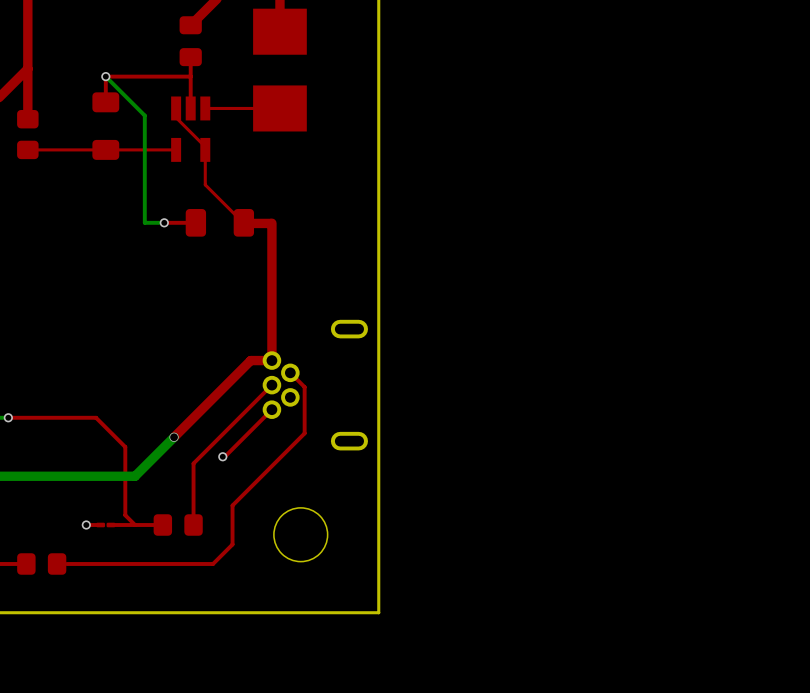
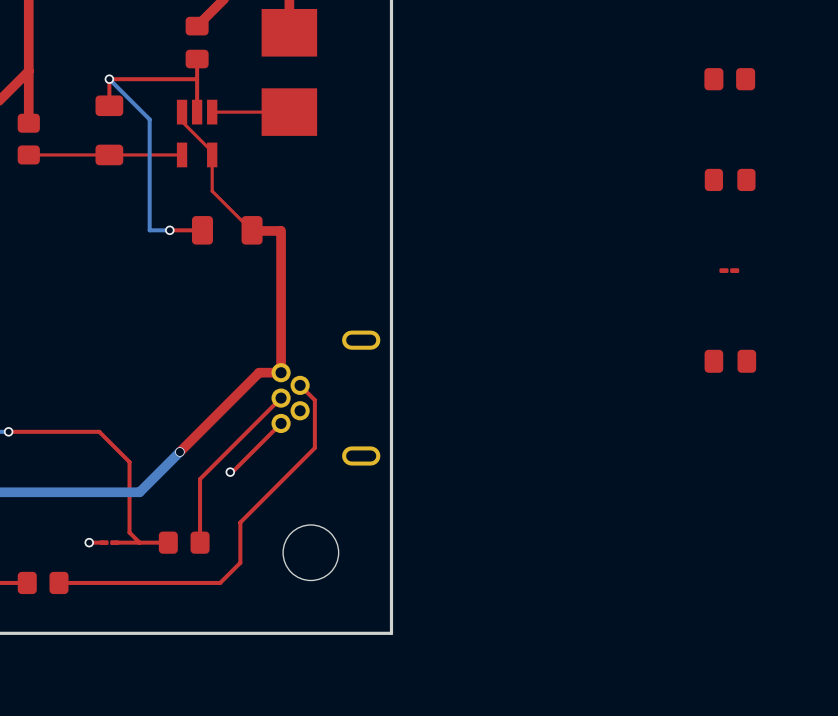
part: none -> (729, 79)
part: none -> (730, 179)
part: none -> (729, 270)
part: none -> (730, 361)

